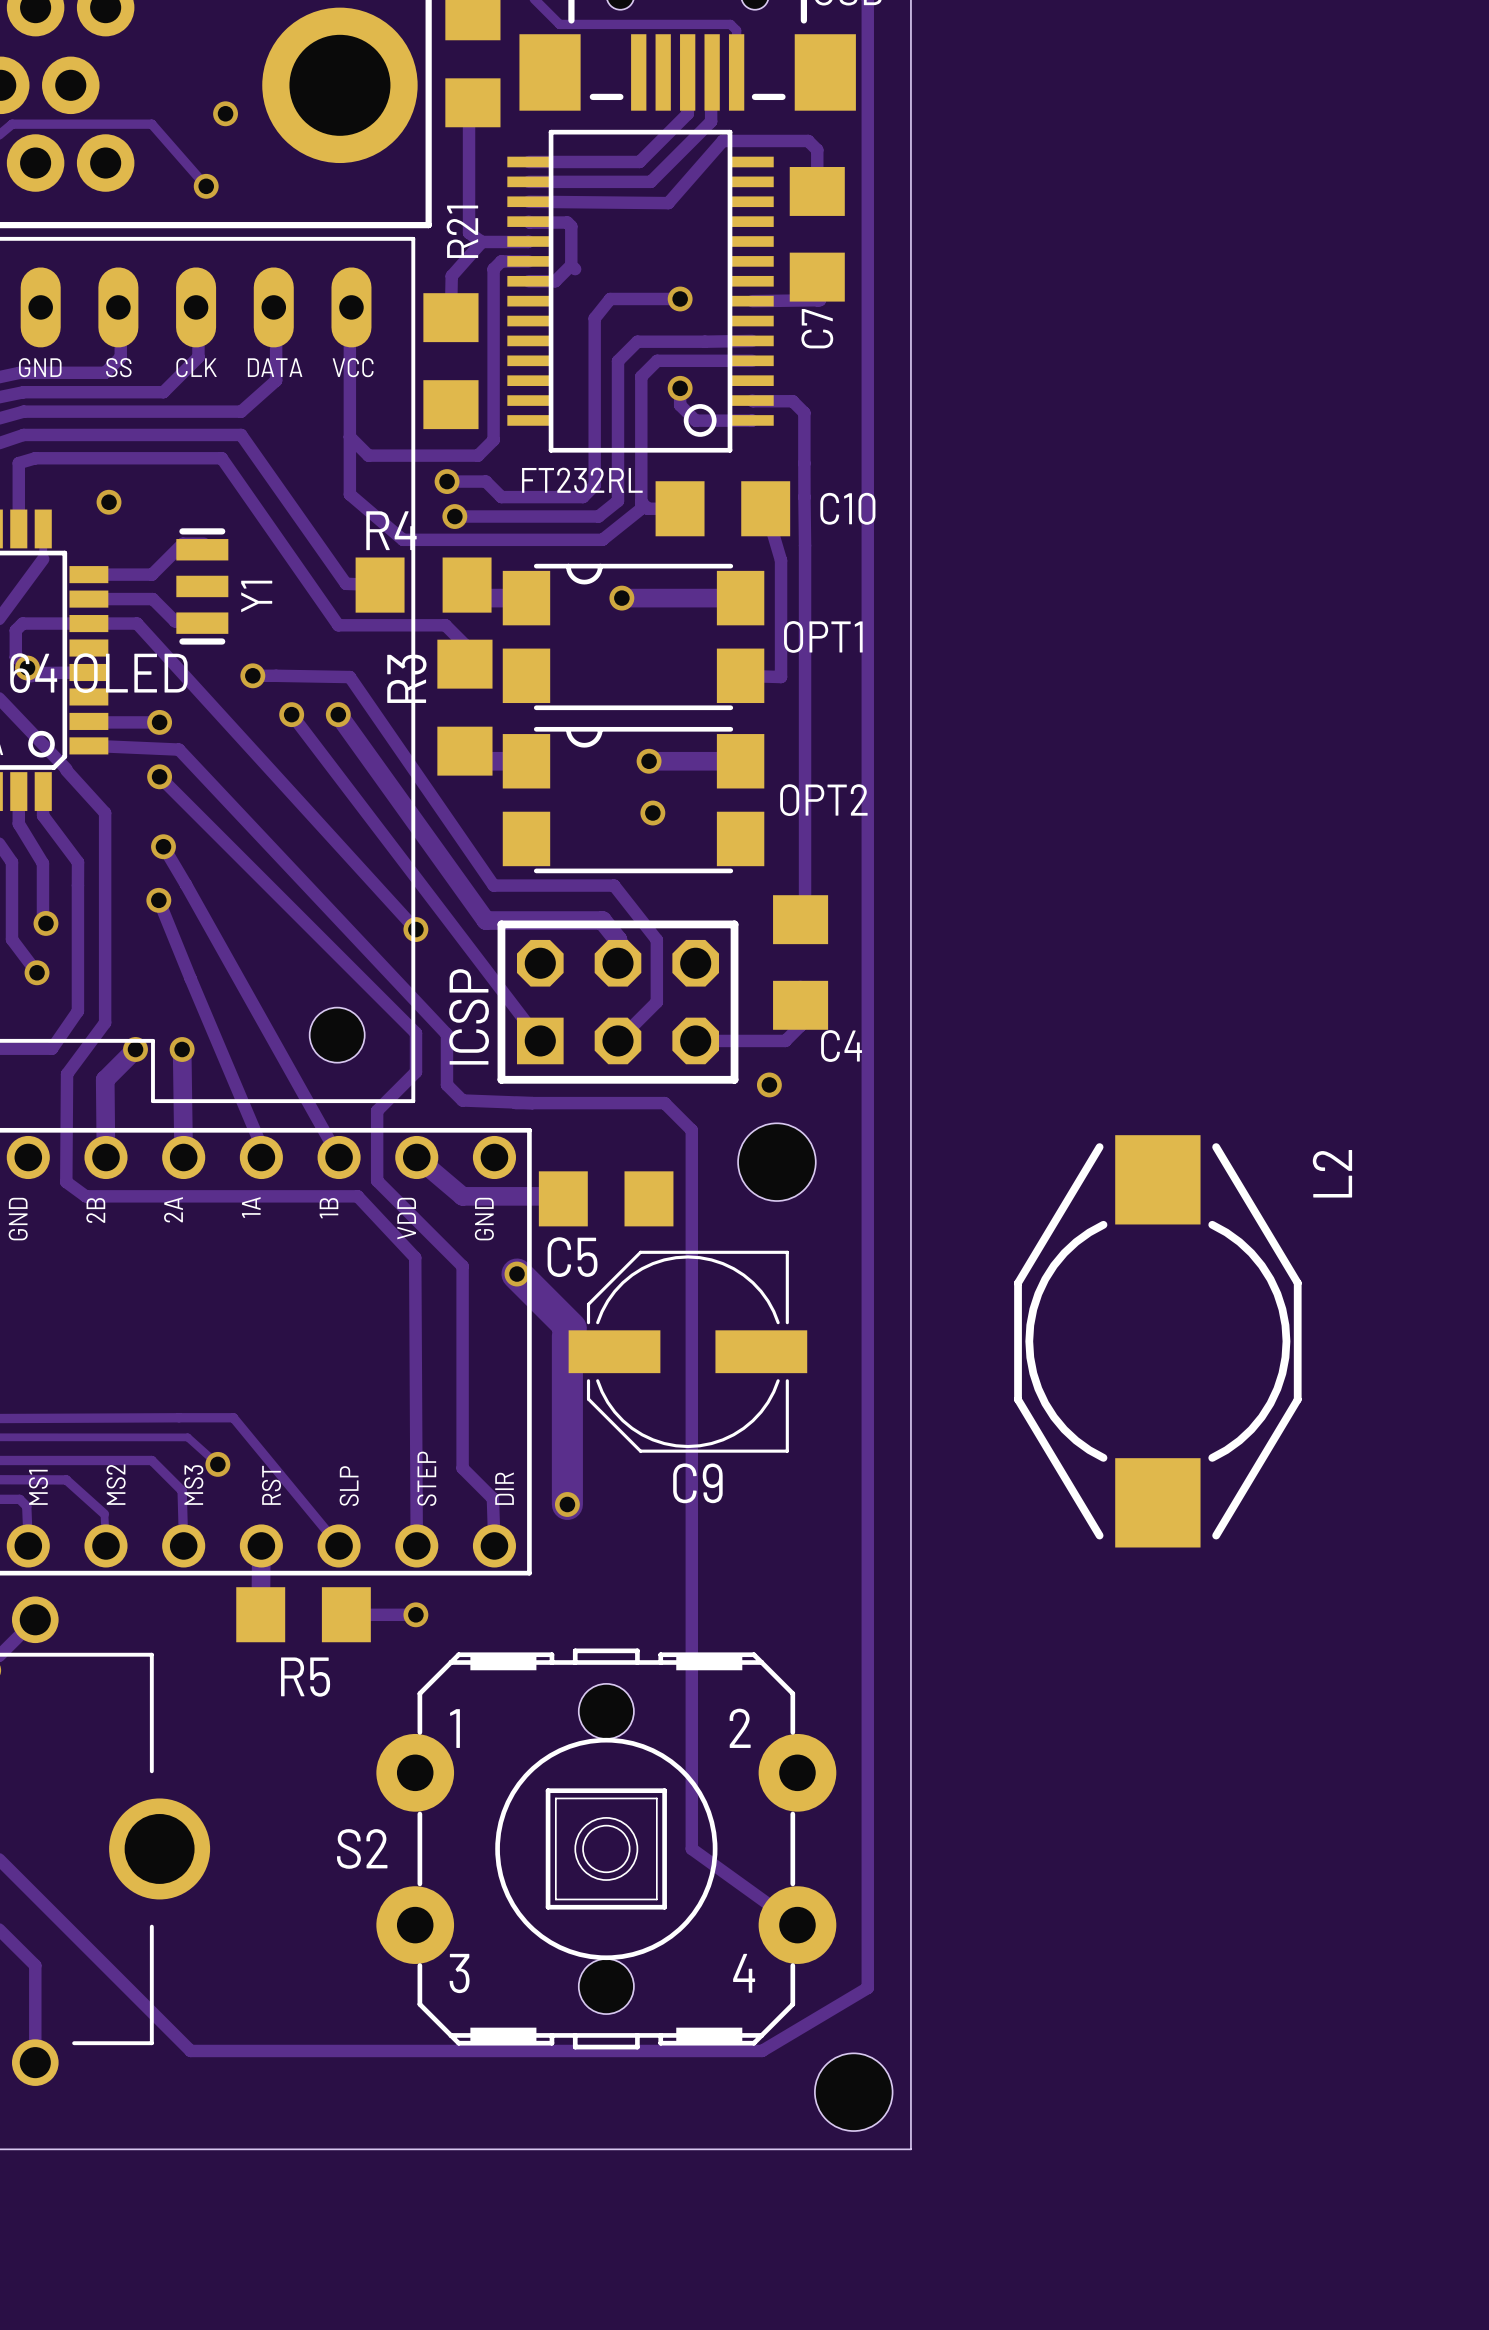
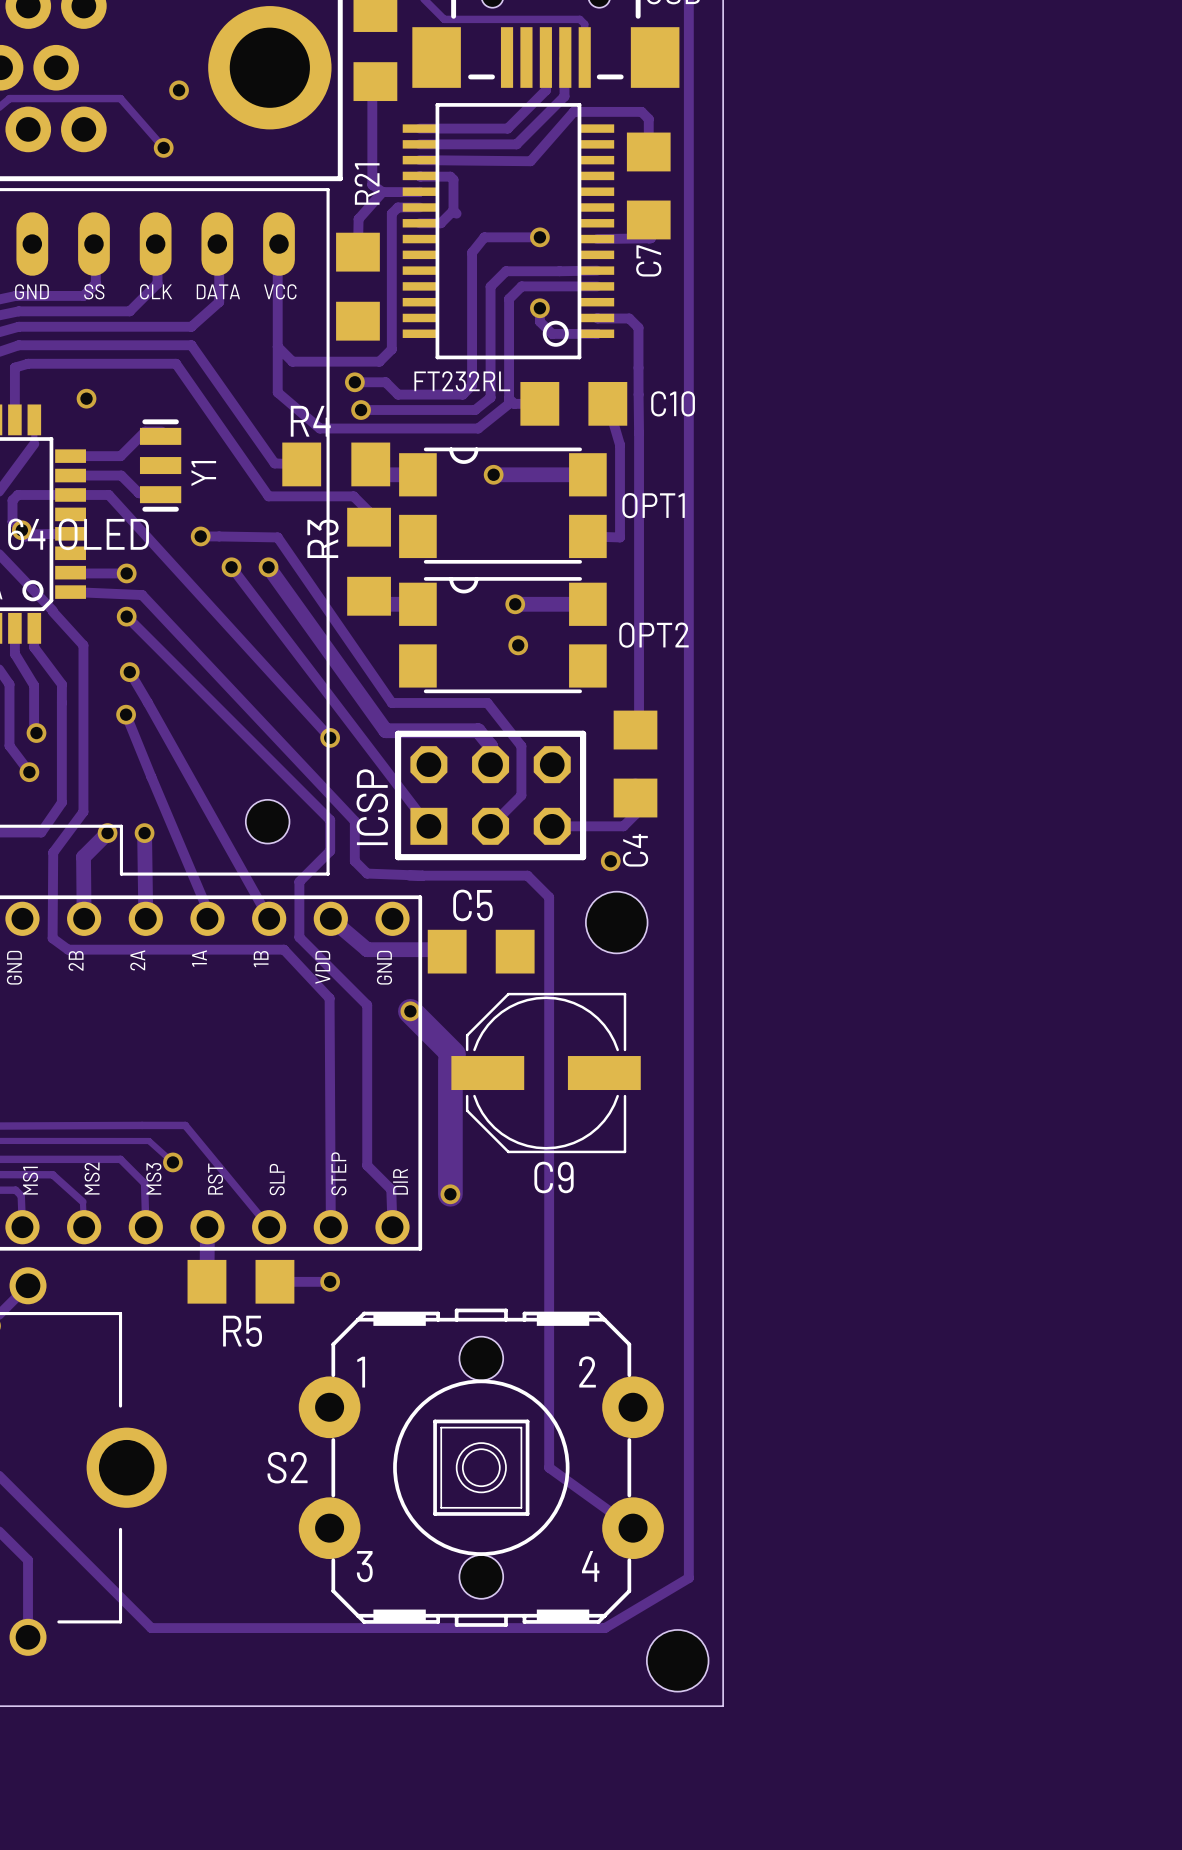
C4 name rotation: 0° (841, 1046) -> 90° counterclockwise (635, 850)
C5 name position: C5 (572, 1257) -> C5 (472, 905)
L2: (1157, 1341) -> none

